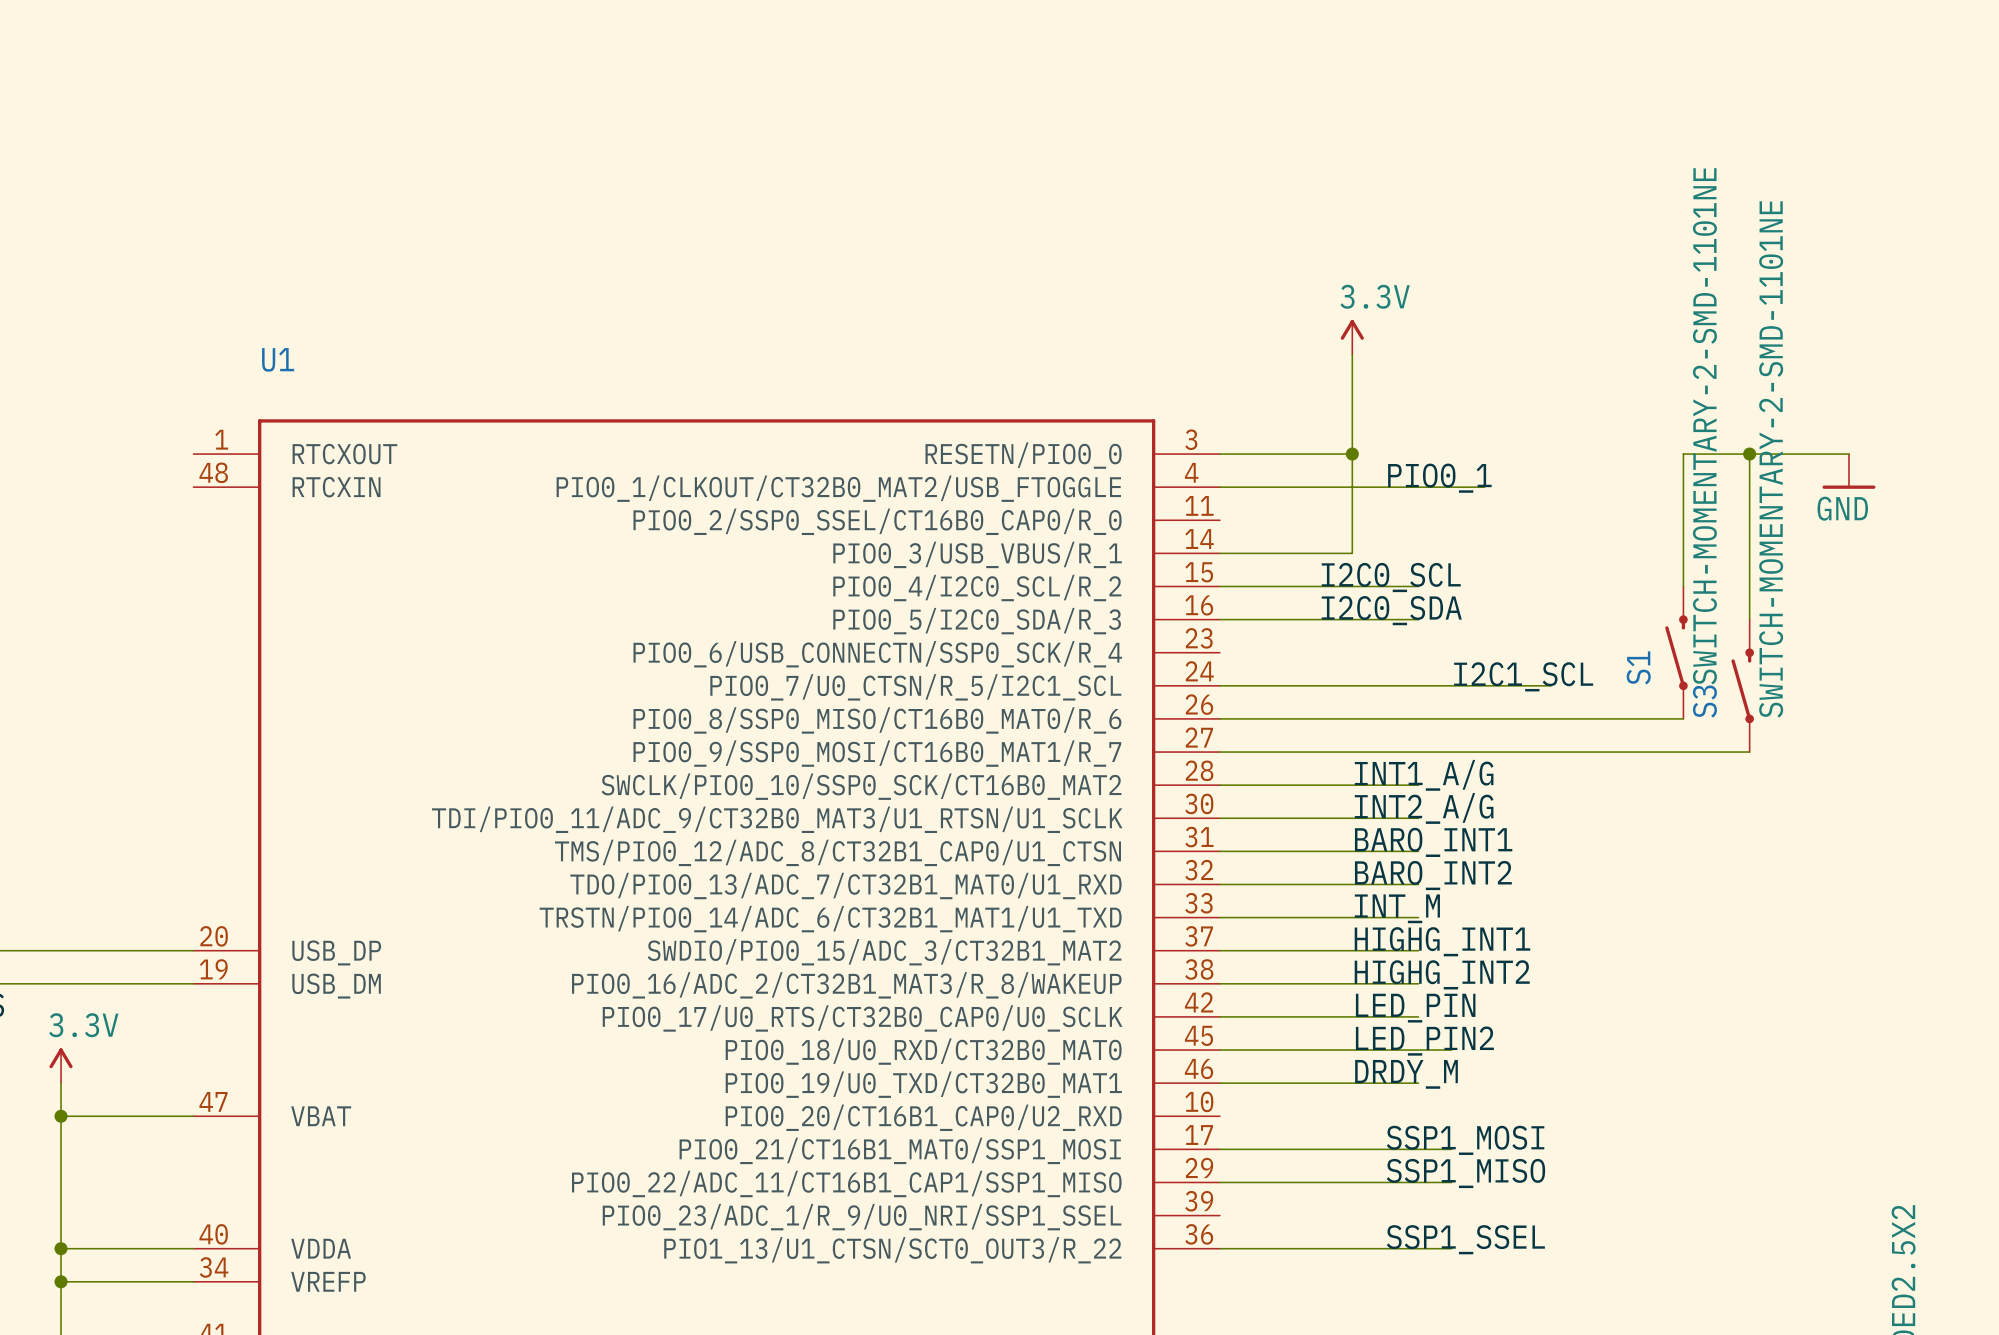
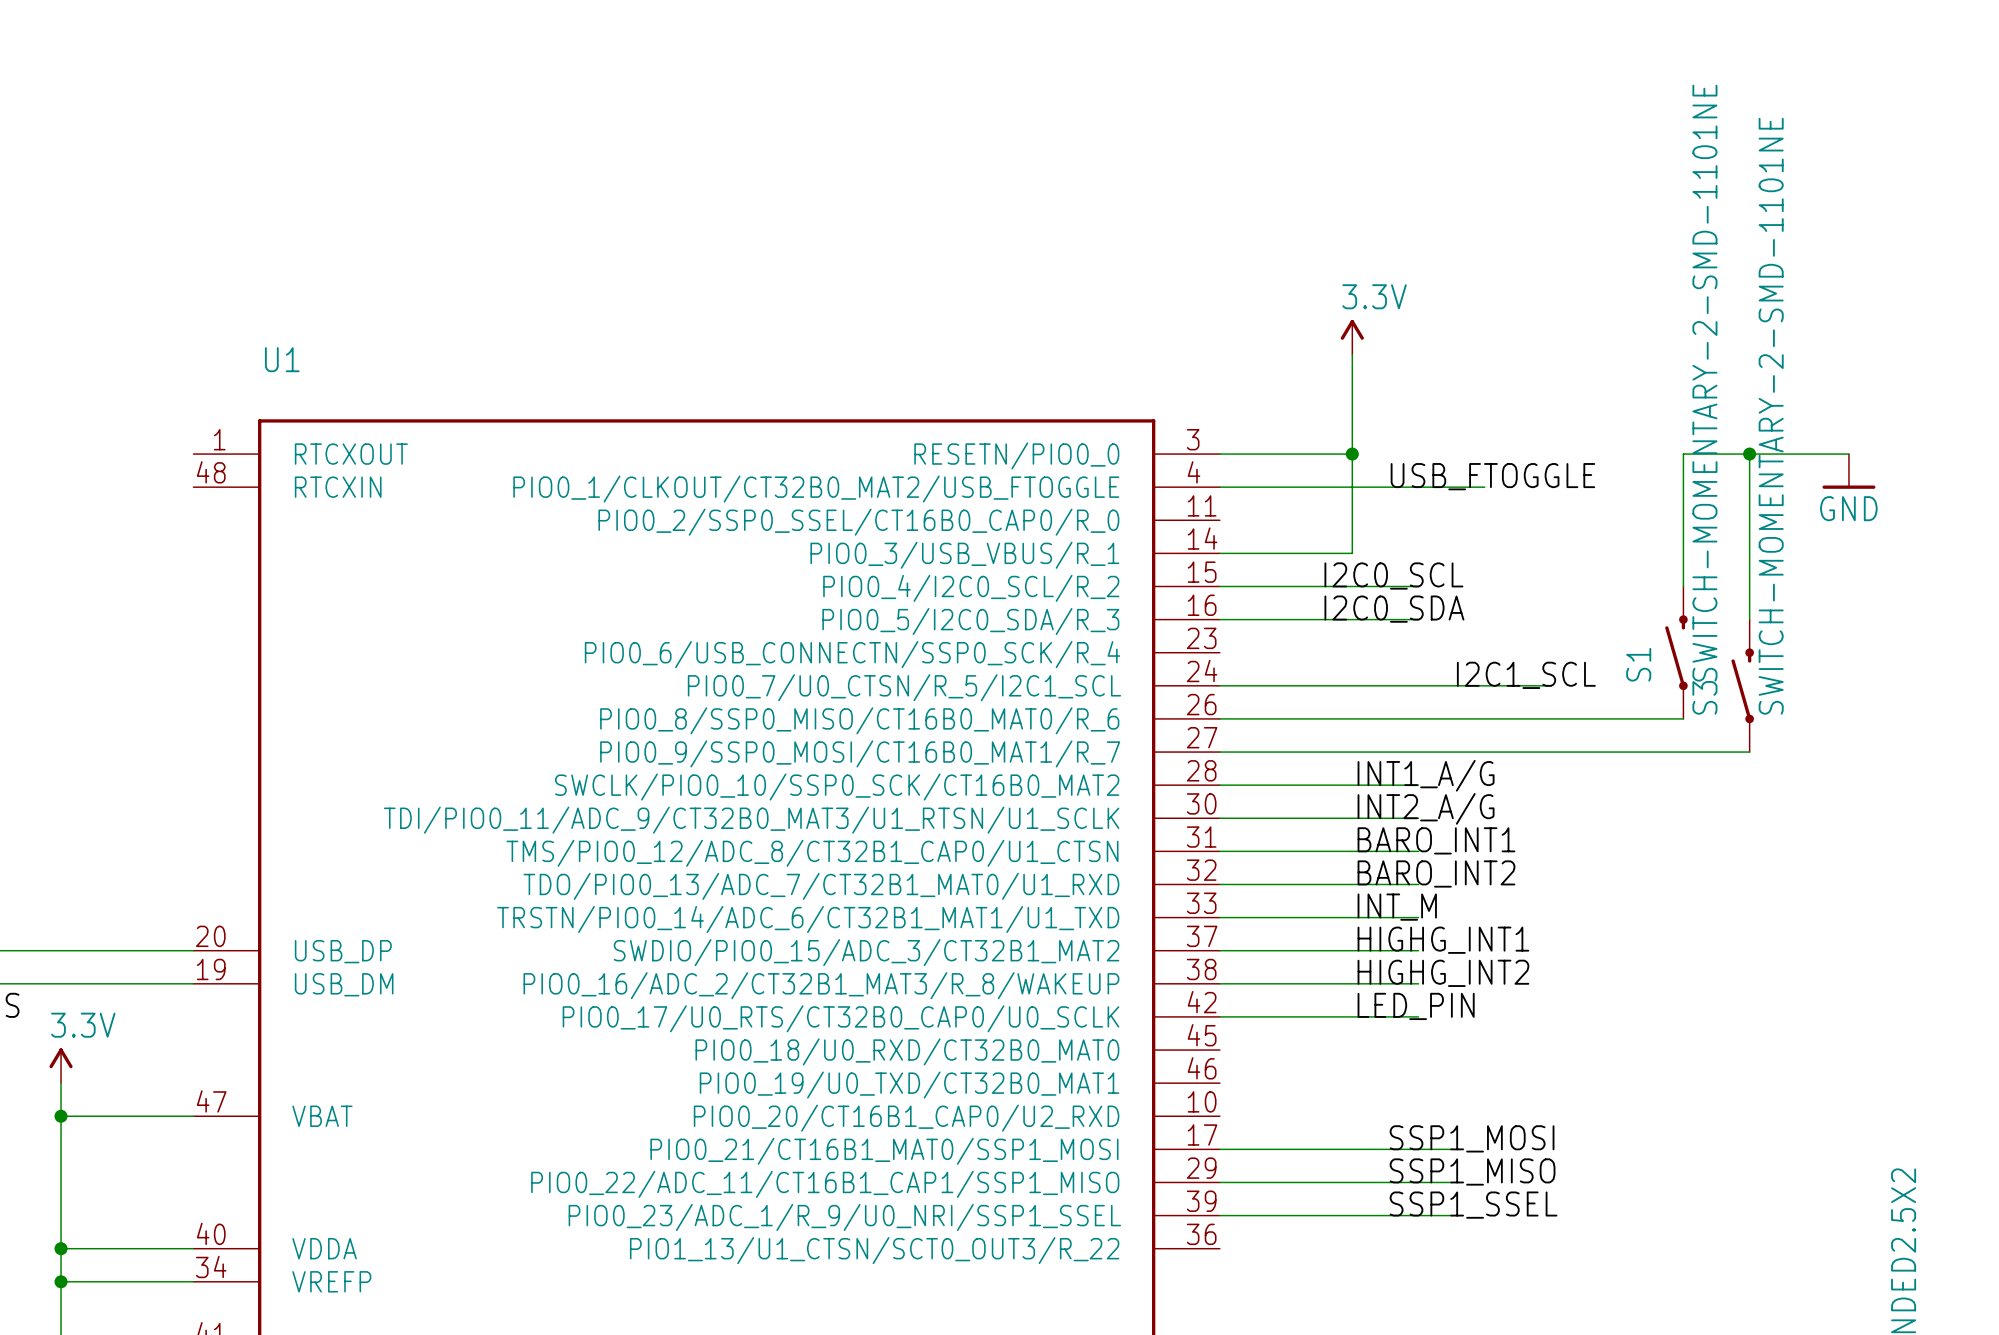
label: PIO0_1 (1439, 478) -> USB_FTOGGLE (1492, 476)
label: LED_PIN2 (1424, 1041) -> none
wire: (1219, 1050) (1451, 1050) -> none
label: DRDY_M (1406, 1074) -> none
wire: (1219, 1083) (1418, 1083) -> none
label position: SSP1_SSEL (1465, 1239) -> SSP1_SSEL (1473, 1205)
wire: (1219, 1248) (1451, 1248) -> (1219, 1215) (1451, 1215)

